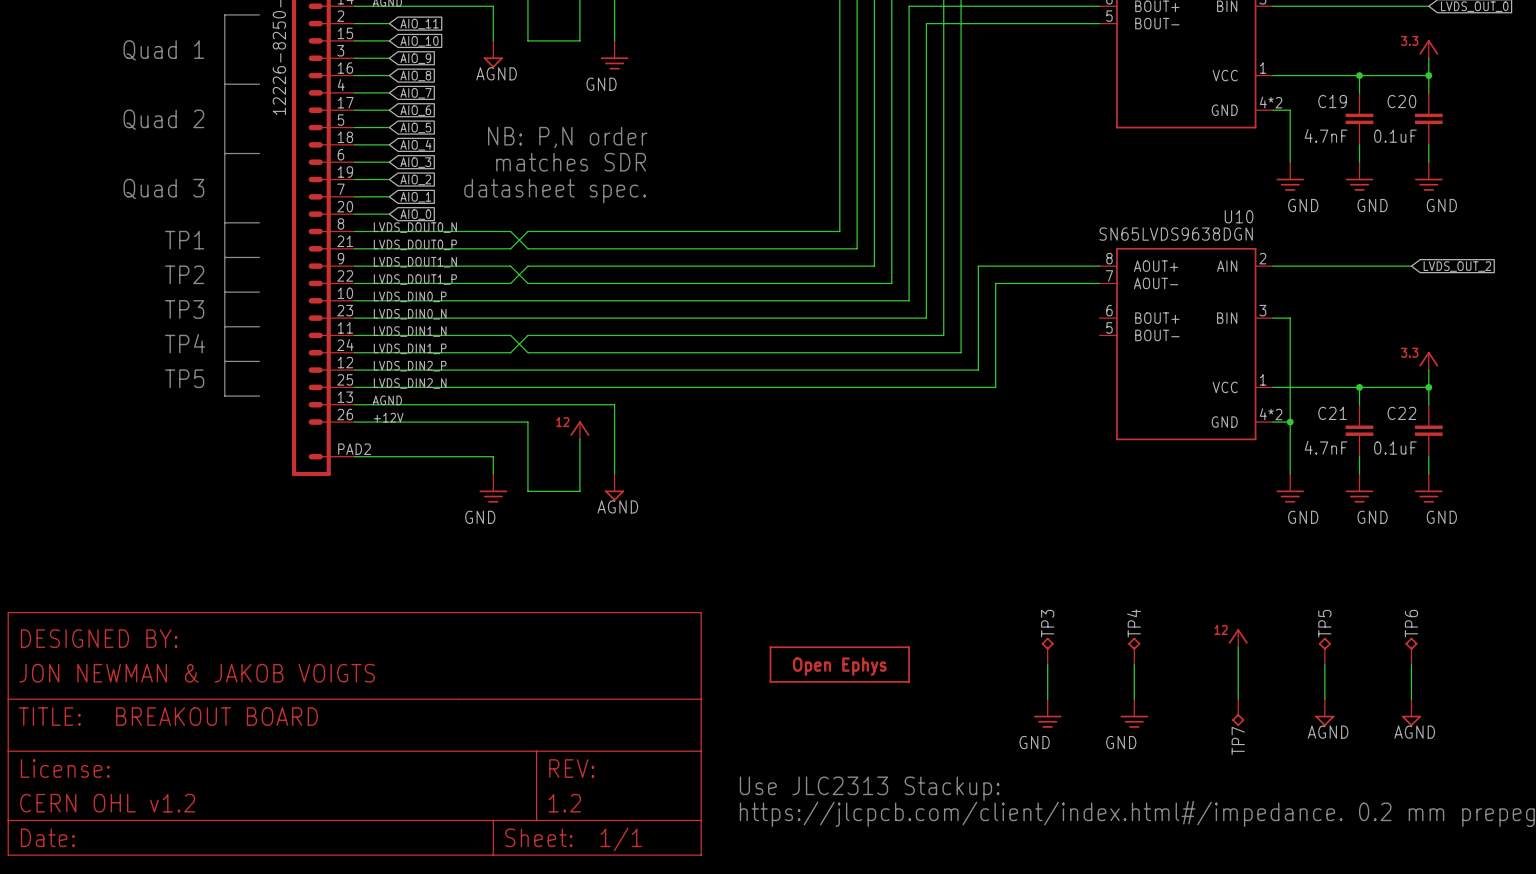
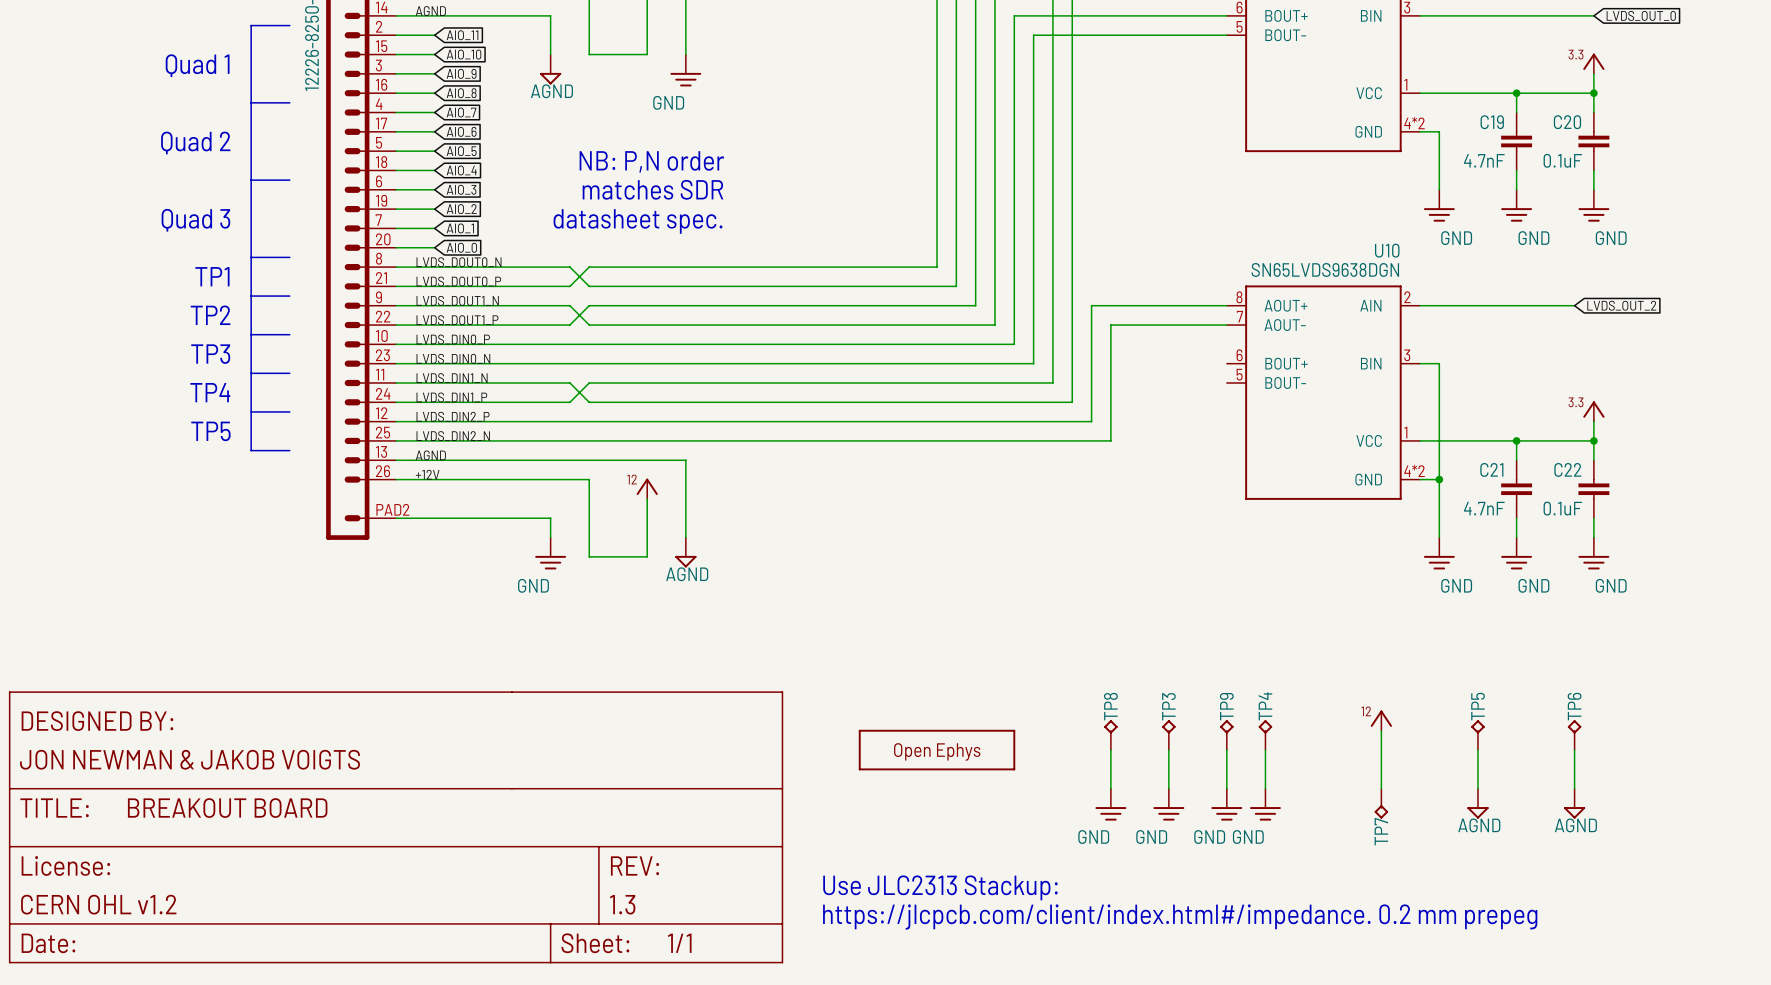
TP8: none -> (1110, 735)
TP9: none -> (1226, 735)
wire: none -> (1110, 750) (1110, 788)
wire: none -> (1226, 750) (1226, 788)
power symbol: none -> GND (1110, 804)
power symbol: none -> GND (1226, 804)
part text: 1.2 (564, 803) -> 1.3 (622, 904)

